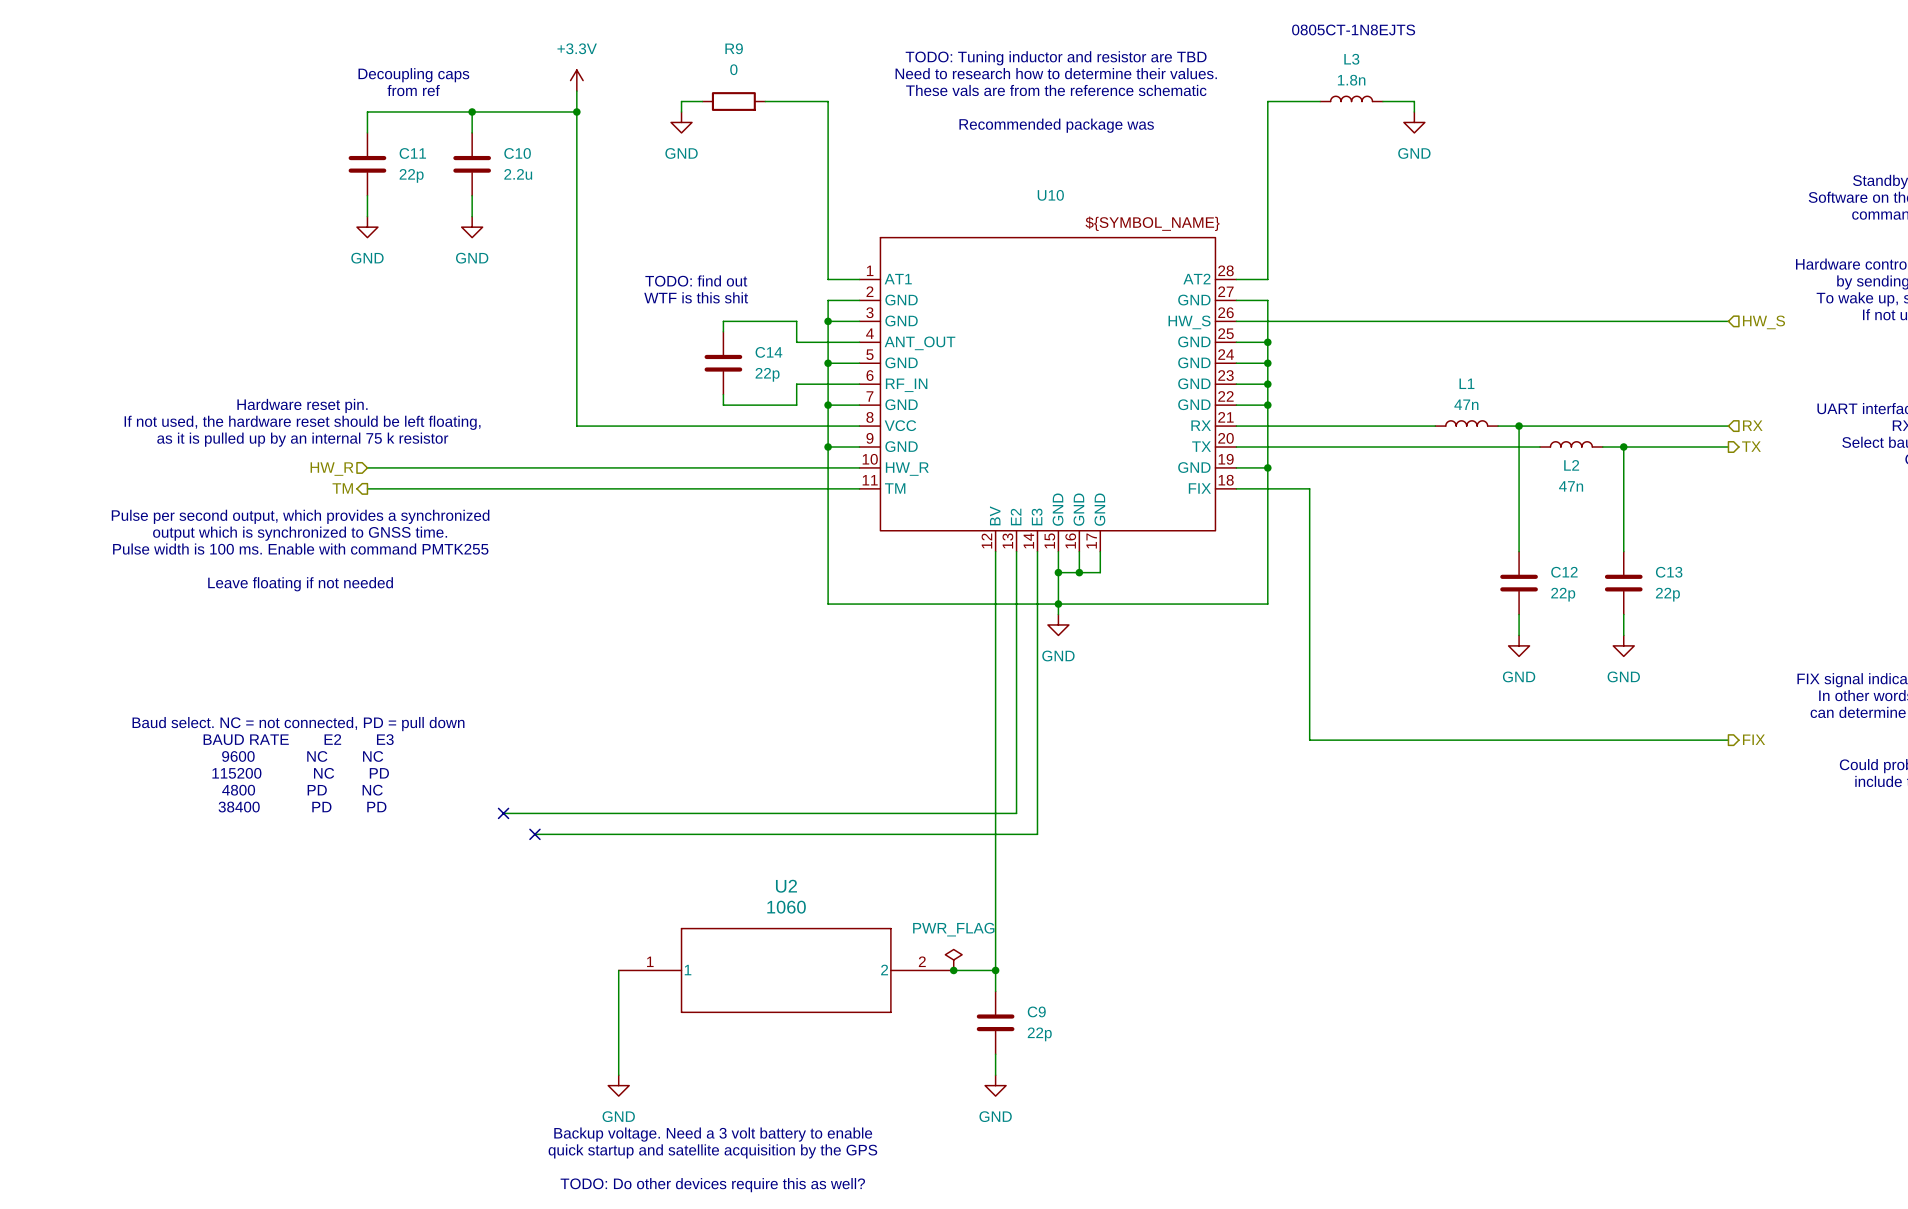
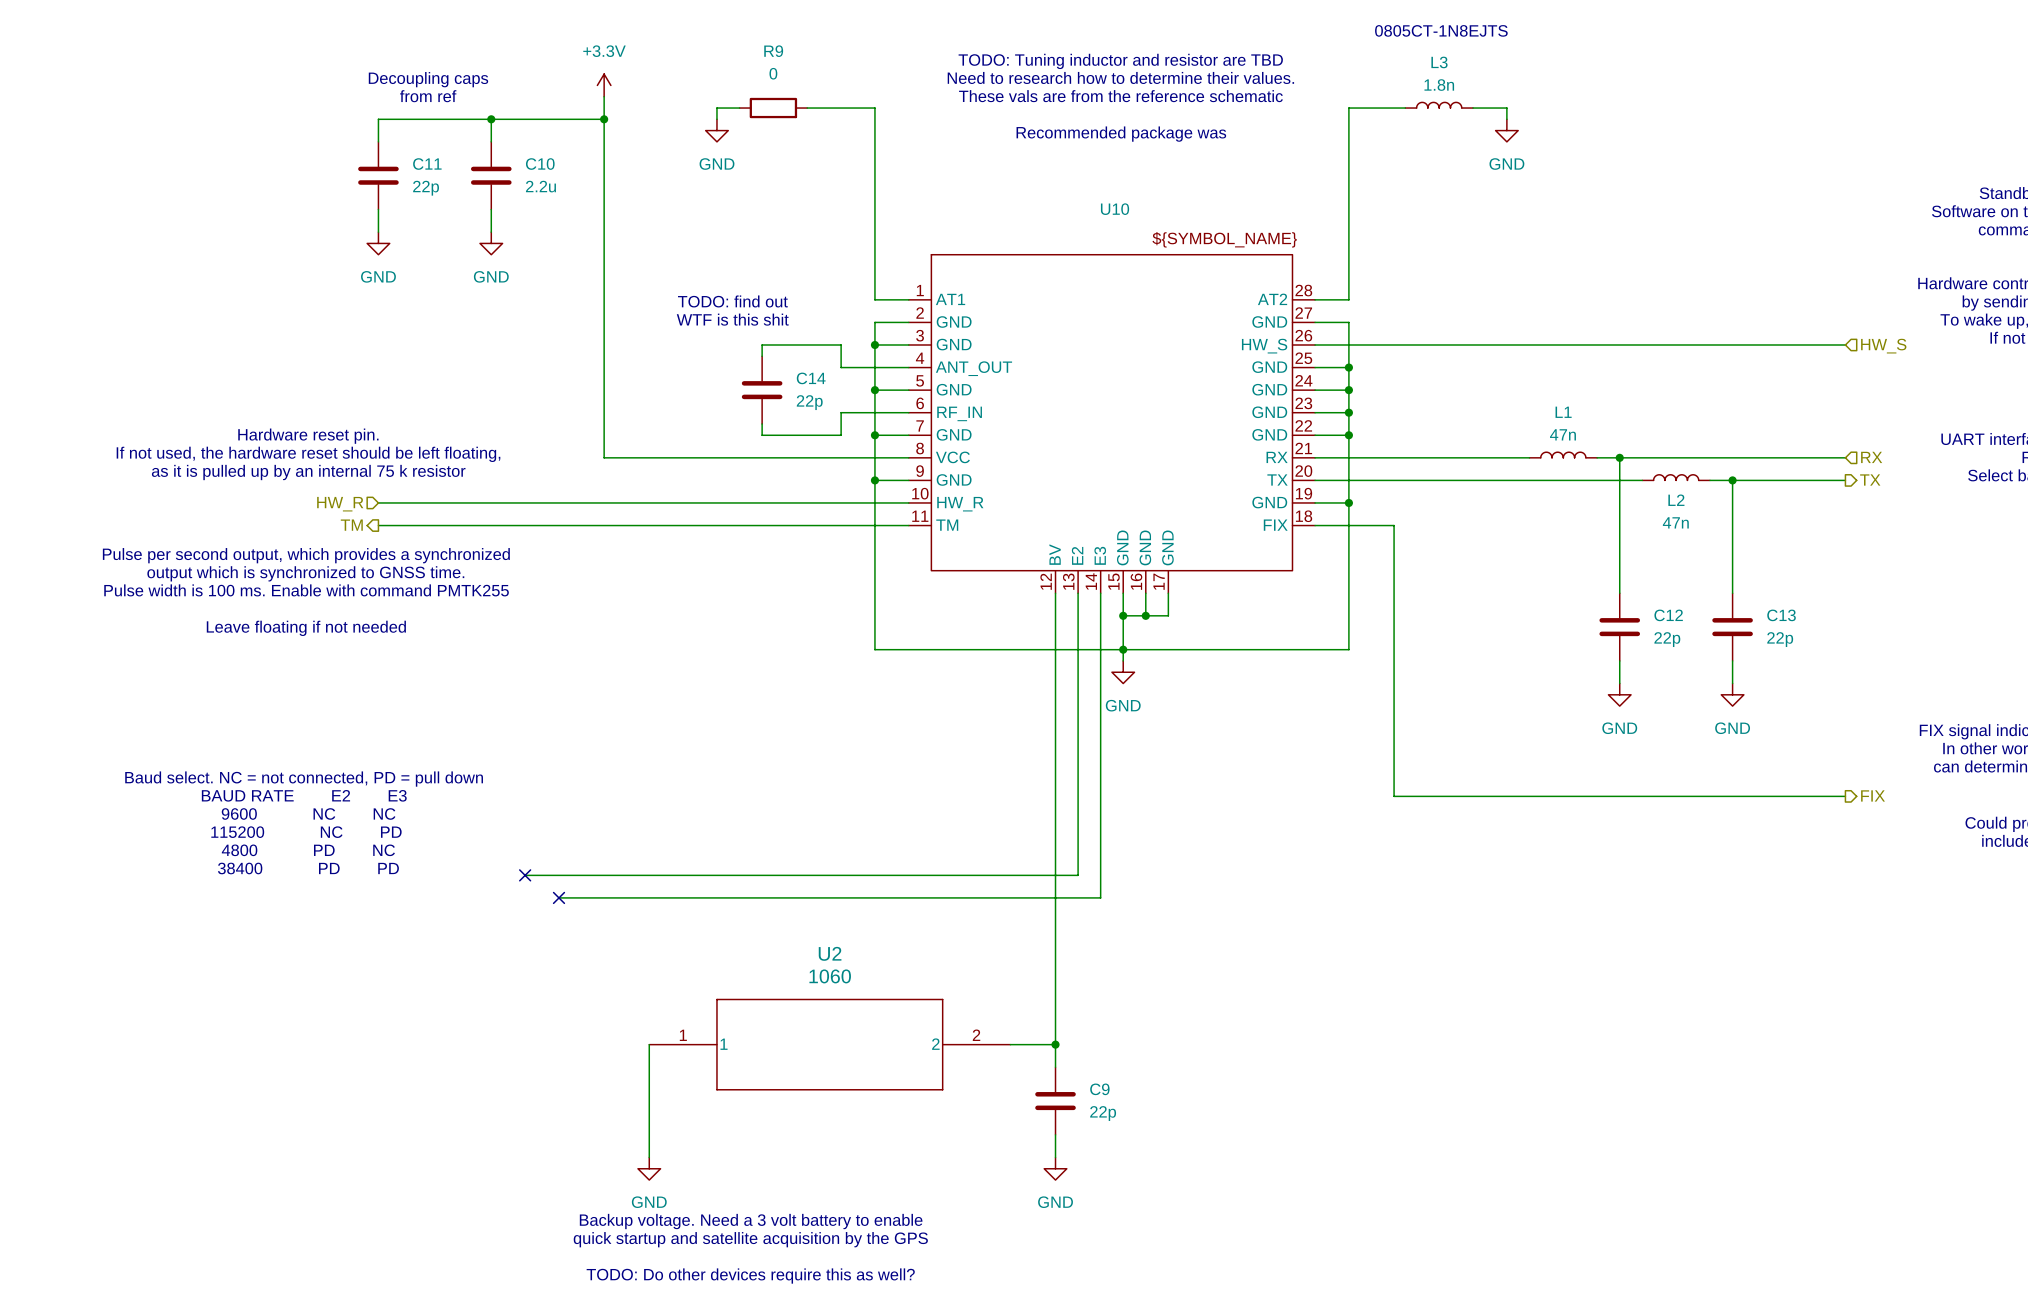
power symbol: PWR_FLAG (953, 959) -> none
junction: (953, 970) -> none

